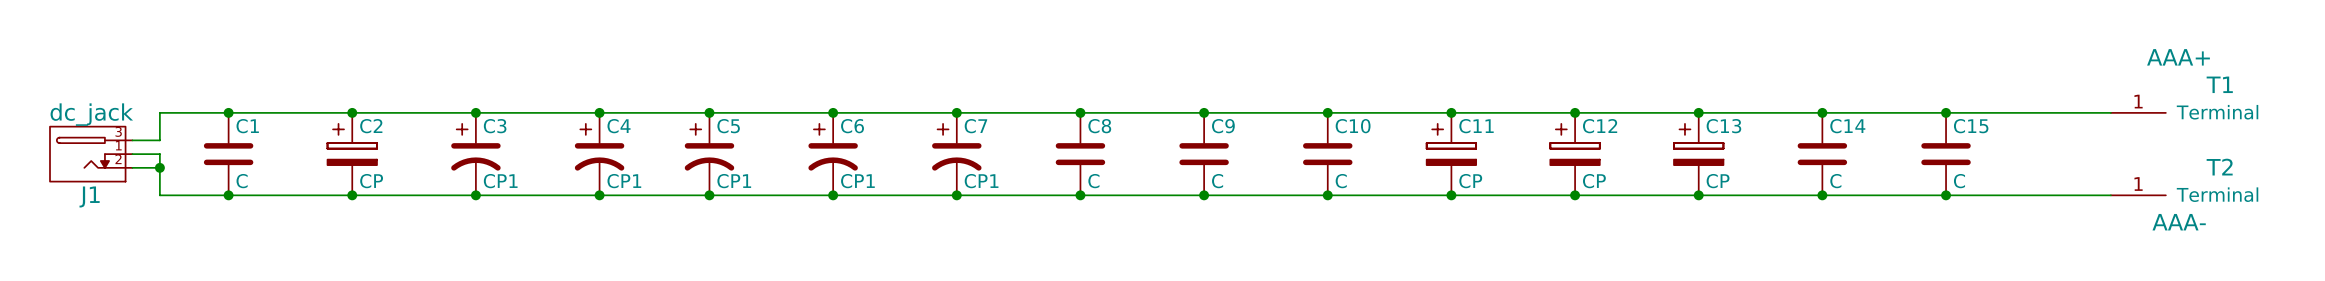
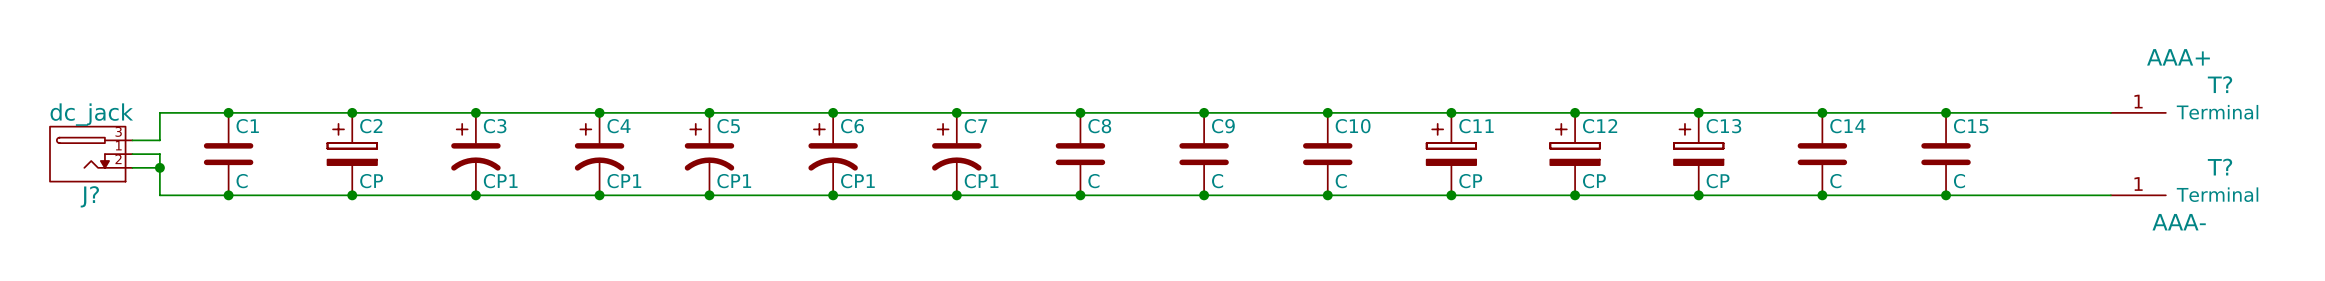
T1 name: T1 (2219, 84) -> T? (2219, 84)
T2 name: T2 (2219, 167) -> T? (2219, 167)
J1 name: J1 (89, 196) -> J? (89, 196)

